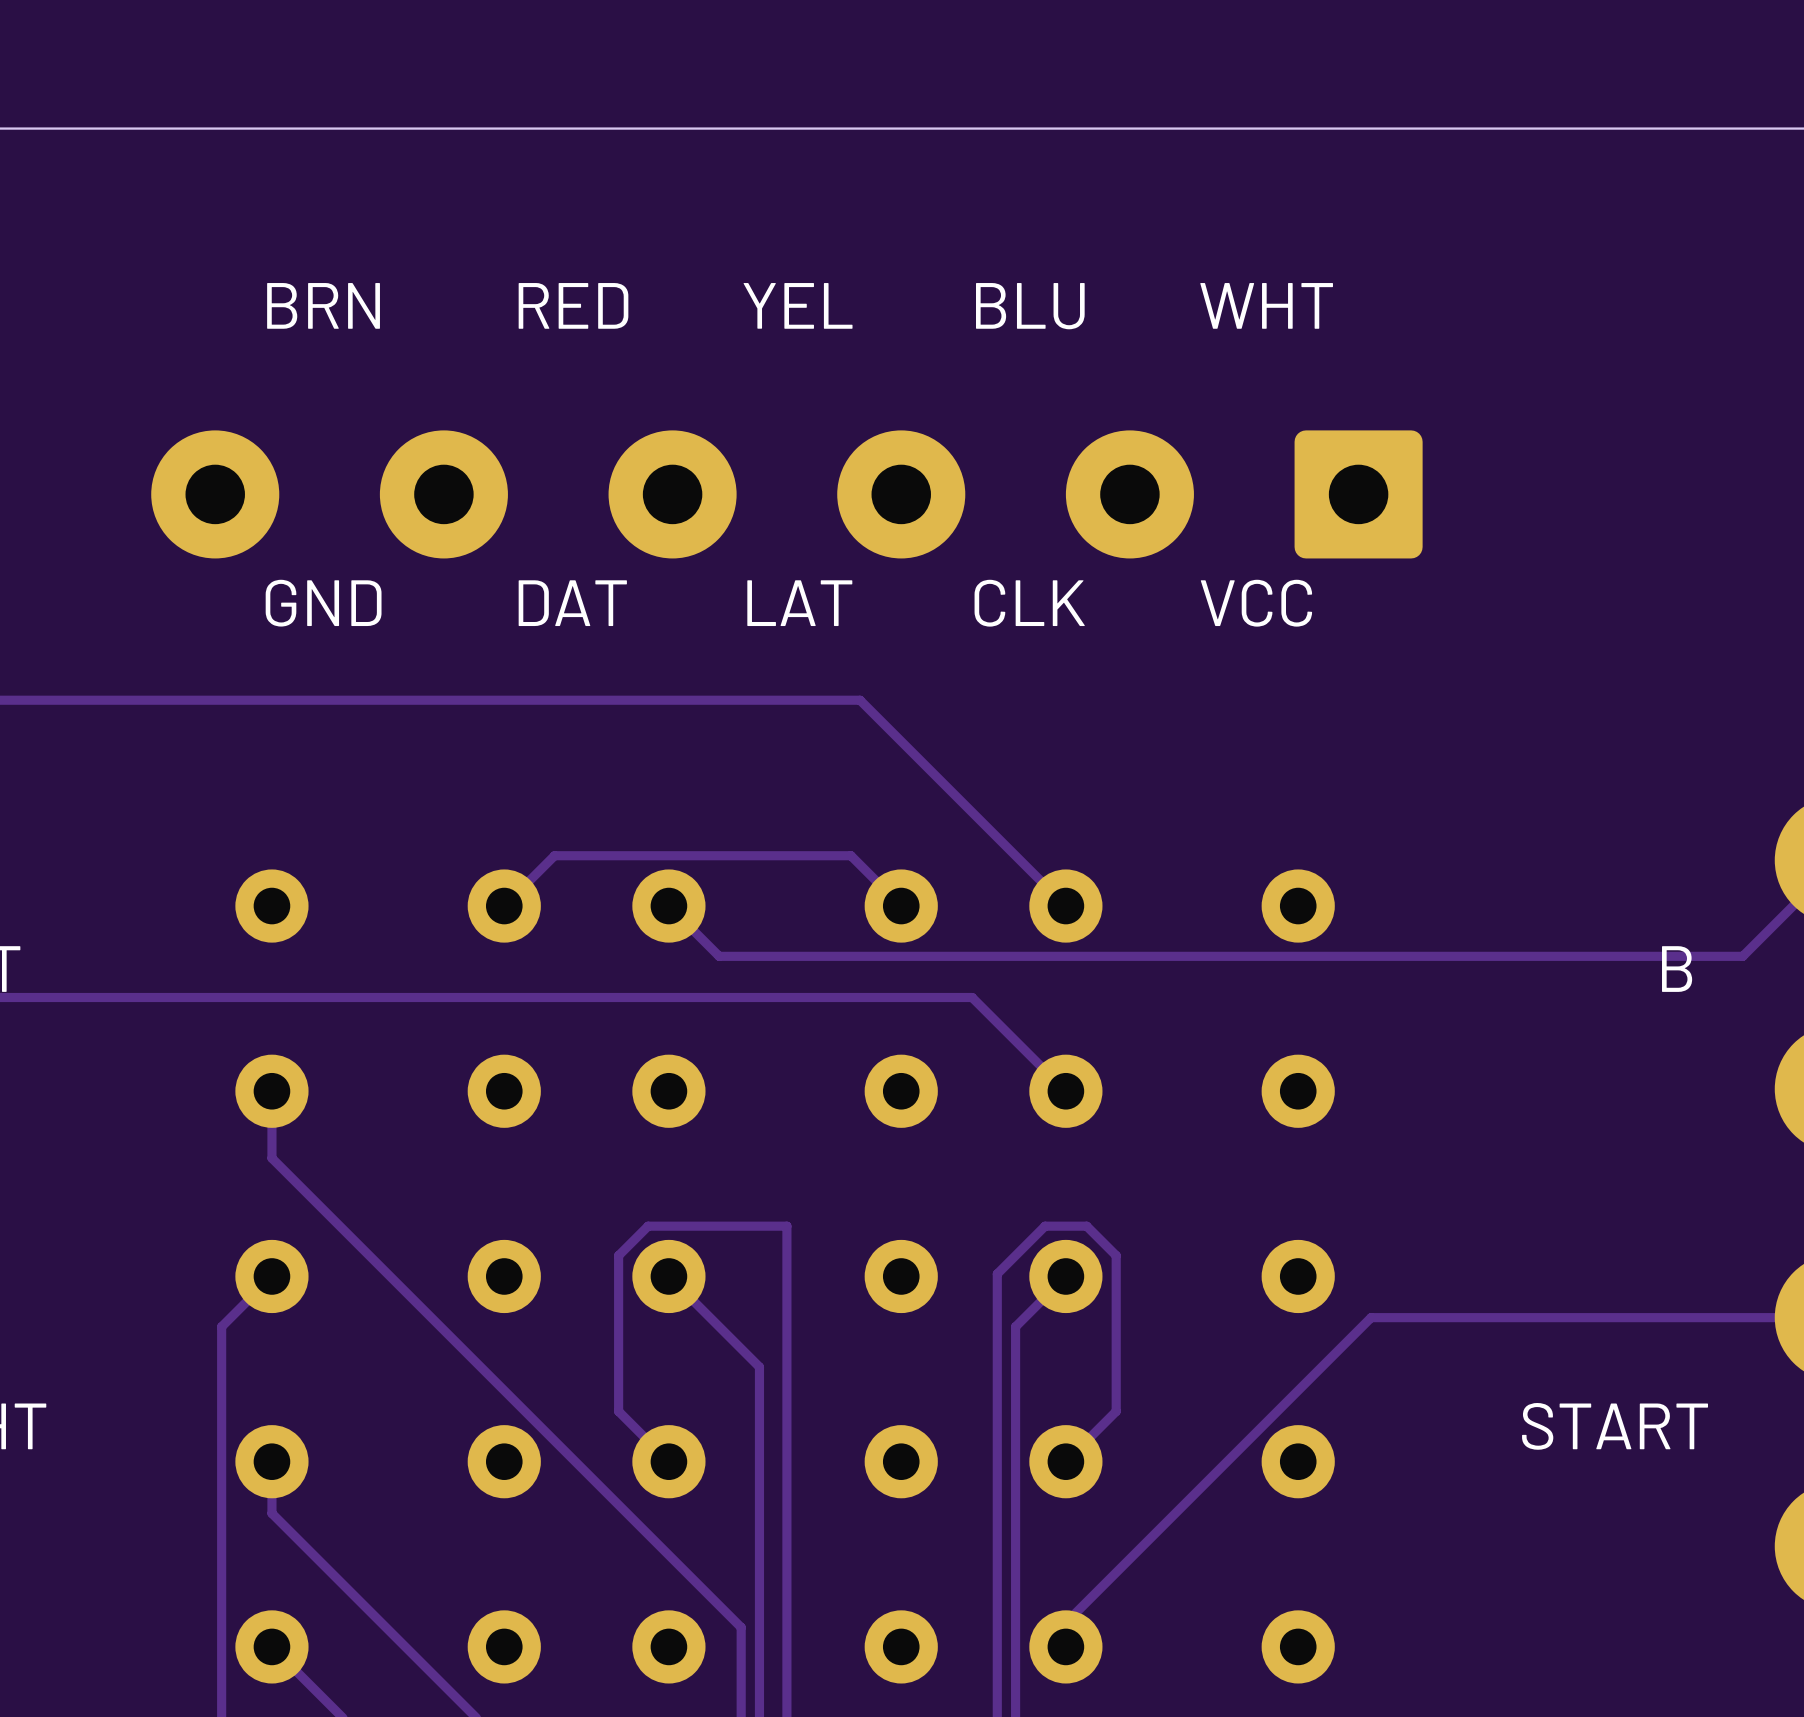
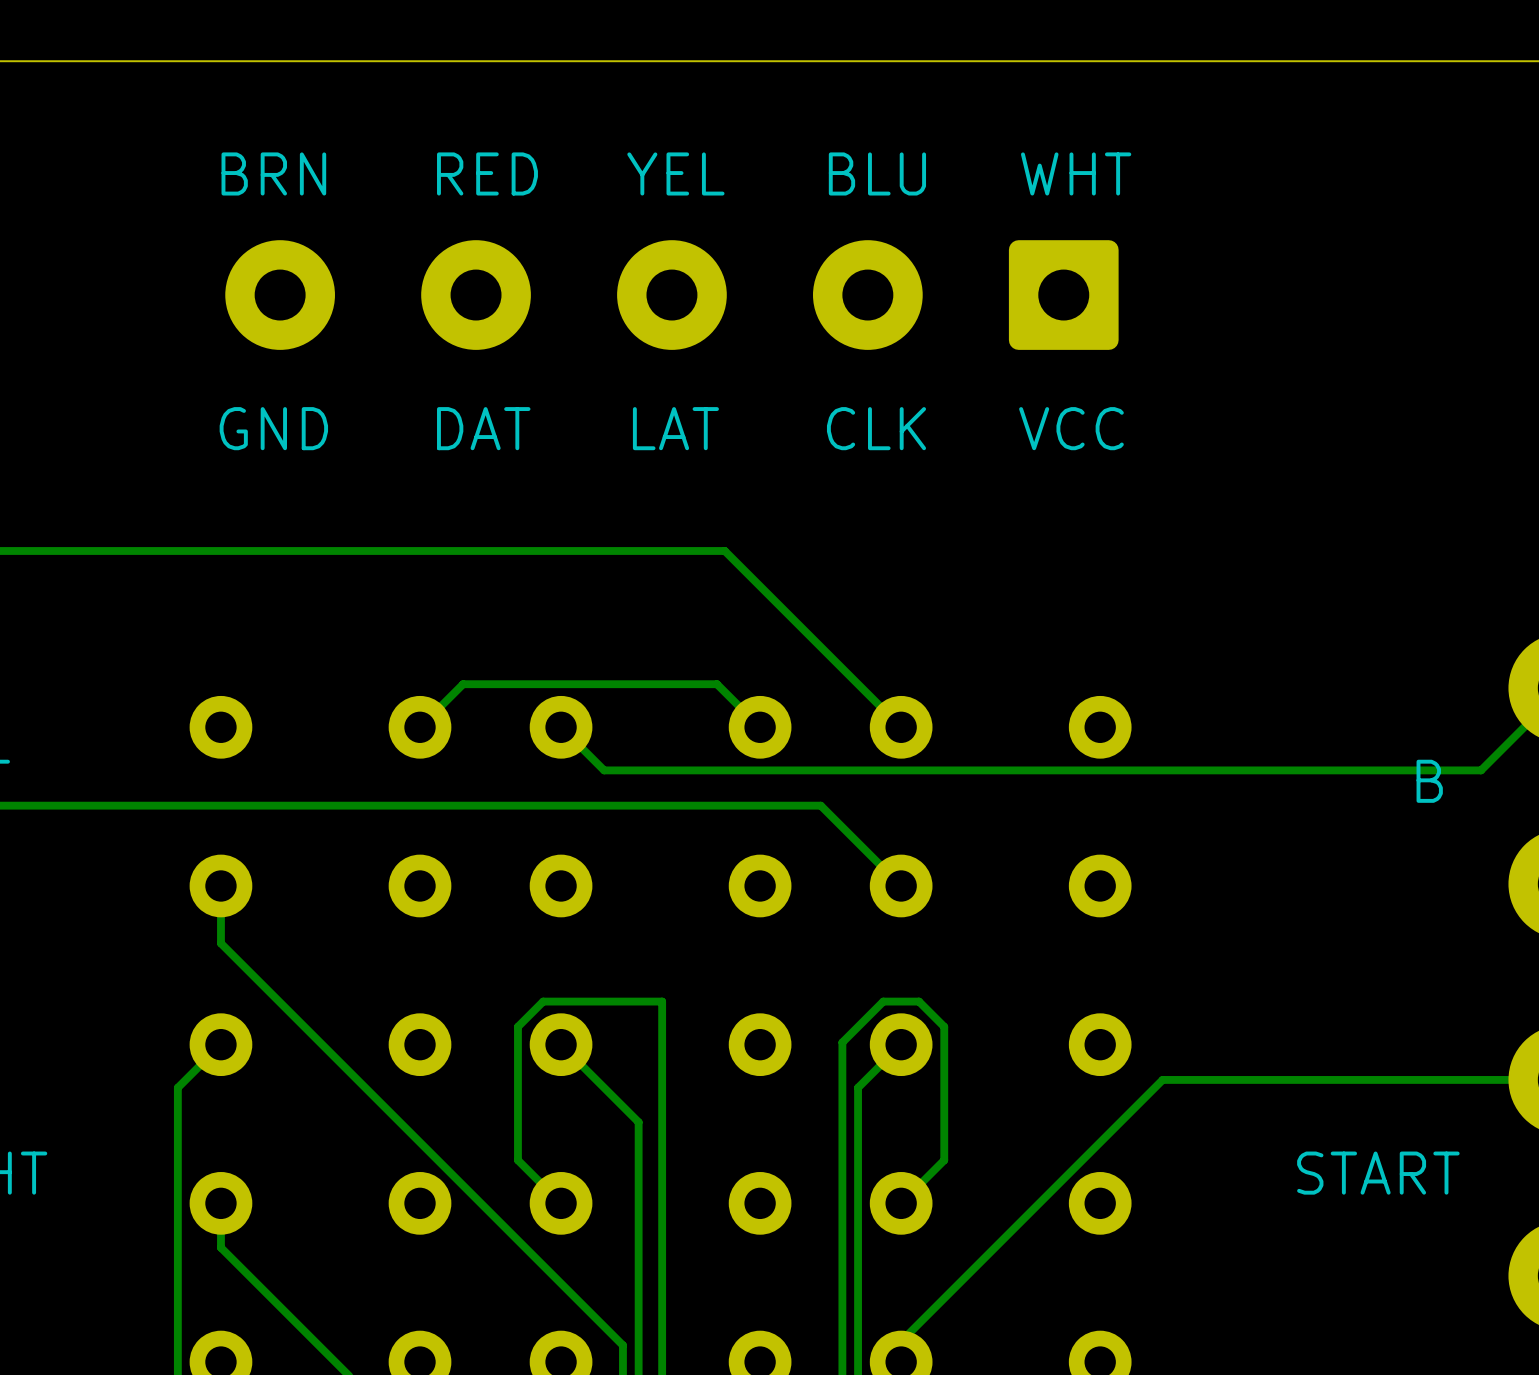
text position: BRN (323, 305) -> BRN (273, 173)
text position: RED (573, 305) -> RED (487, 173)
text position: YEL (798, 305) -> YEL (675, 173)
text position: WHT (1266, 305) -> WHT (1076, 173)
text position: BLU (1030, 306) -> BLU (877, 173)
part: none -> (671, 295)
part: (786, 494) -> none
text position: GND (323, 603) -> GND (273, 428)
text position: DAT (572, 603) -> DAT (483, 428)
text position: LAT (799, 603) -> LAT (675, 428)
text position: CLK (1029, 603) -> CLK (876, 428)
text position: VCC (1256, 603) -> VCC (1071, 428)

